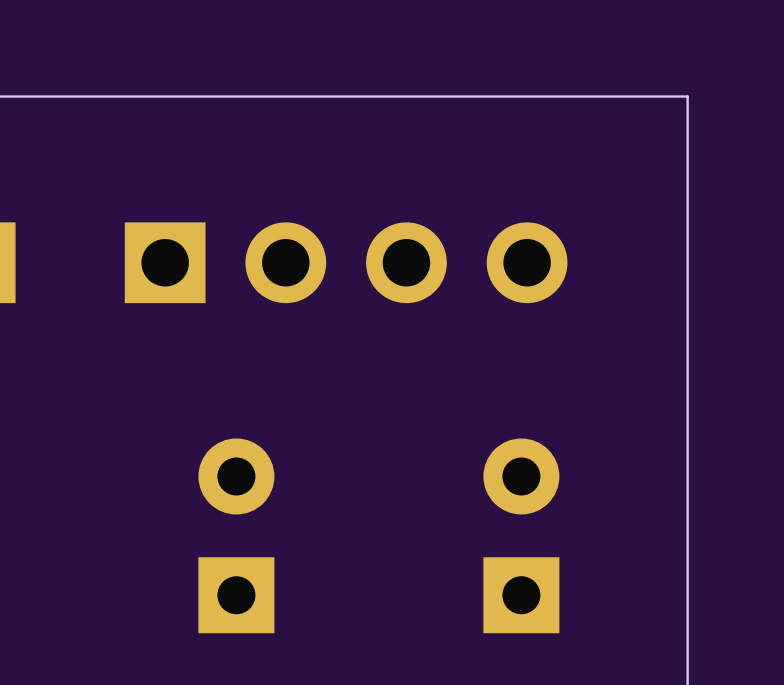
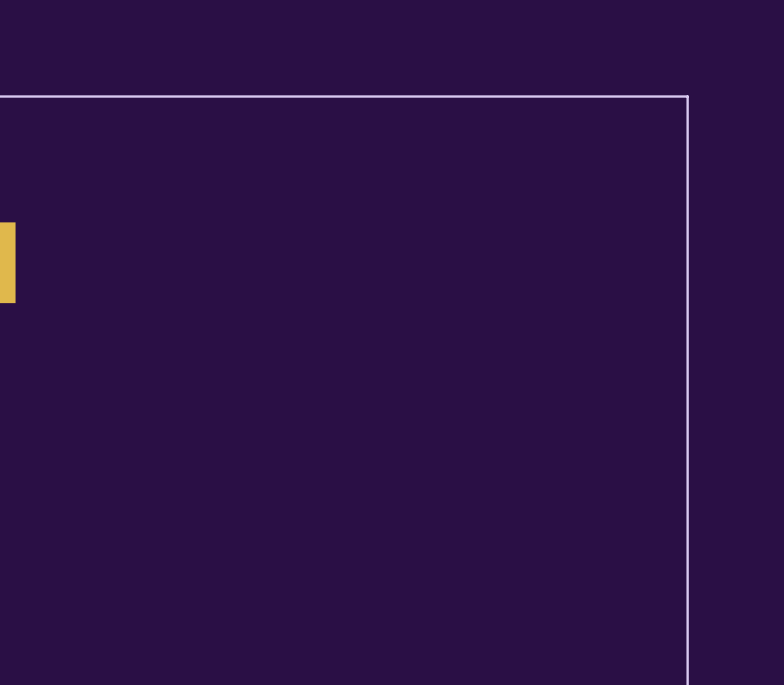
part: (346, 262) -> none
part: (236, 535) -> none
part: (521, 535) -> none

